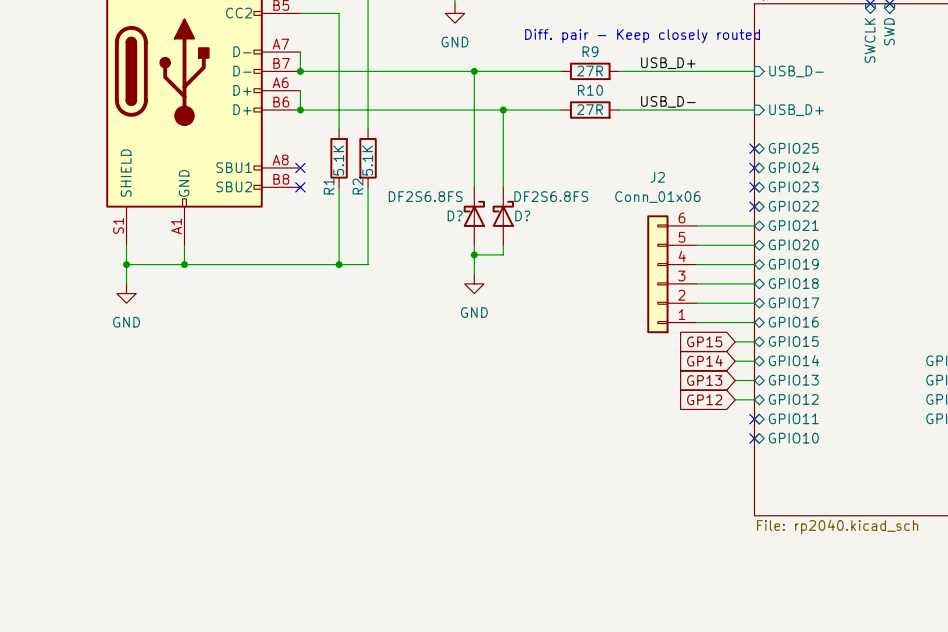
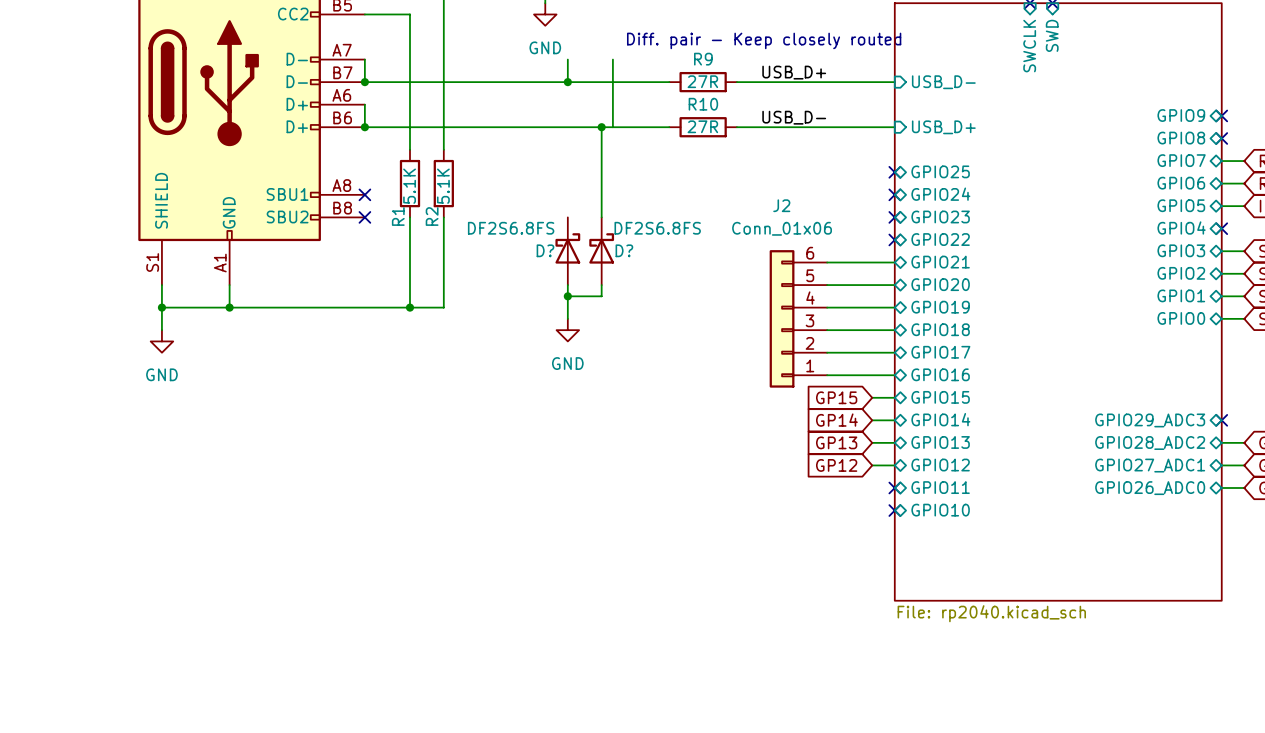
wire: none -> (612, 59) (612, 127)
wire: (474, 71) (474, 187) -> (567, 82) (567, 59)

